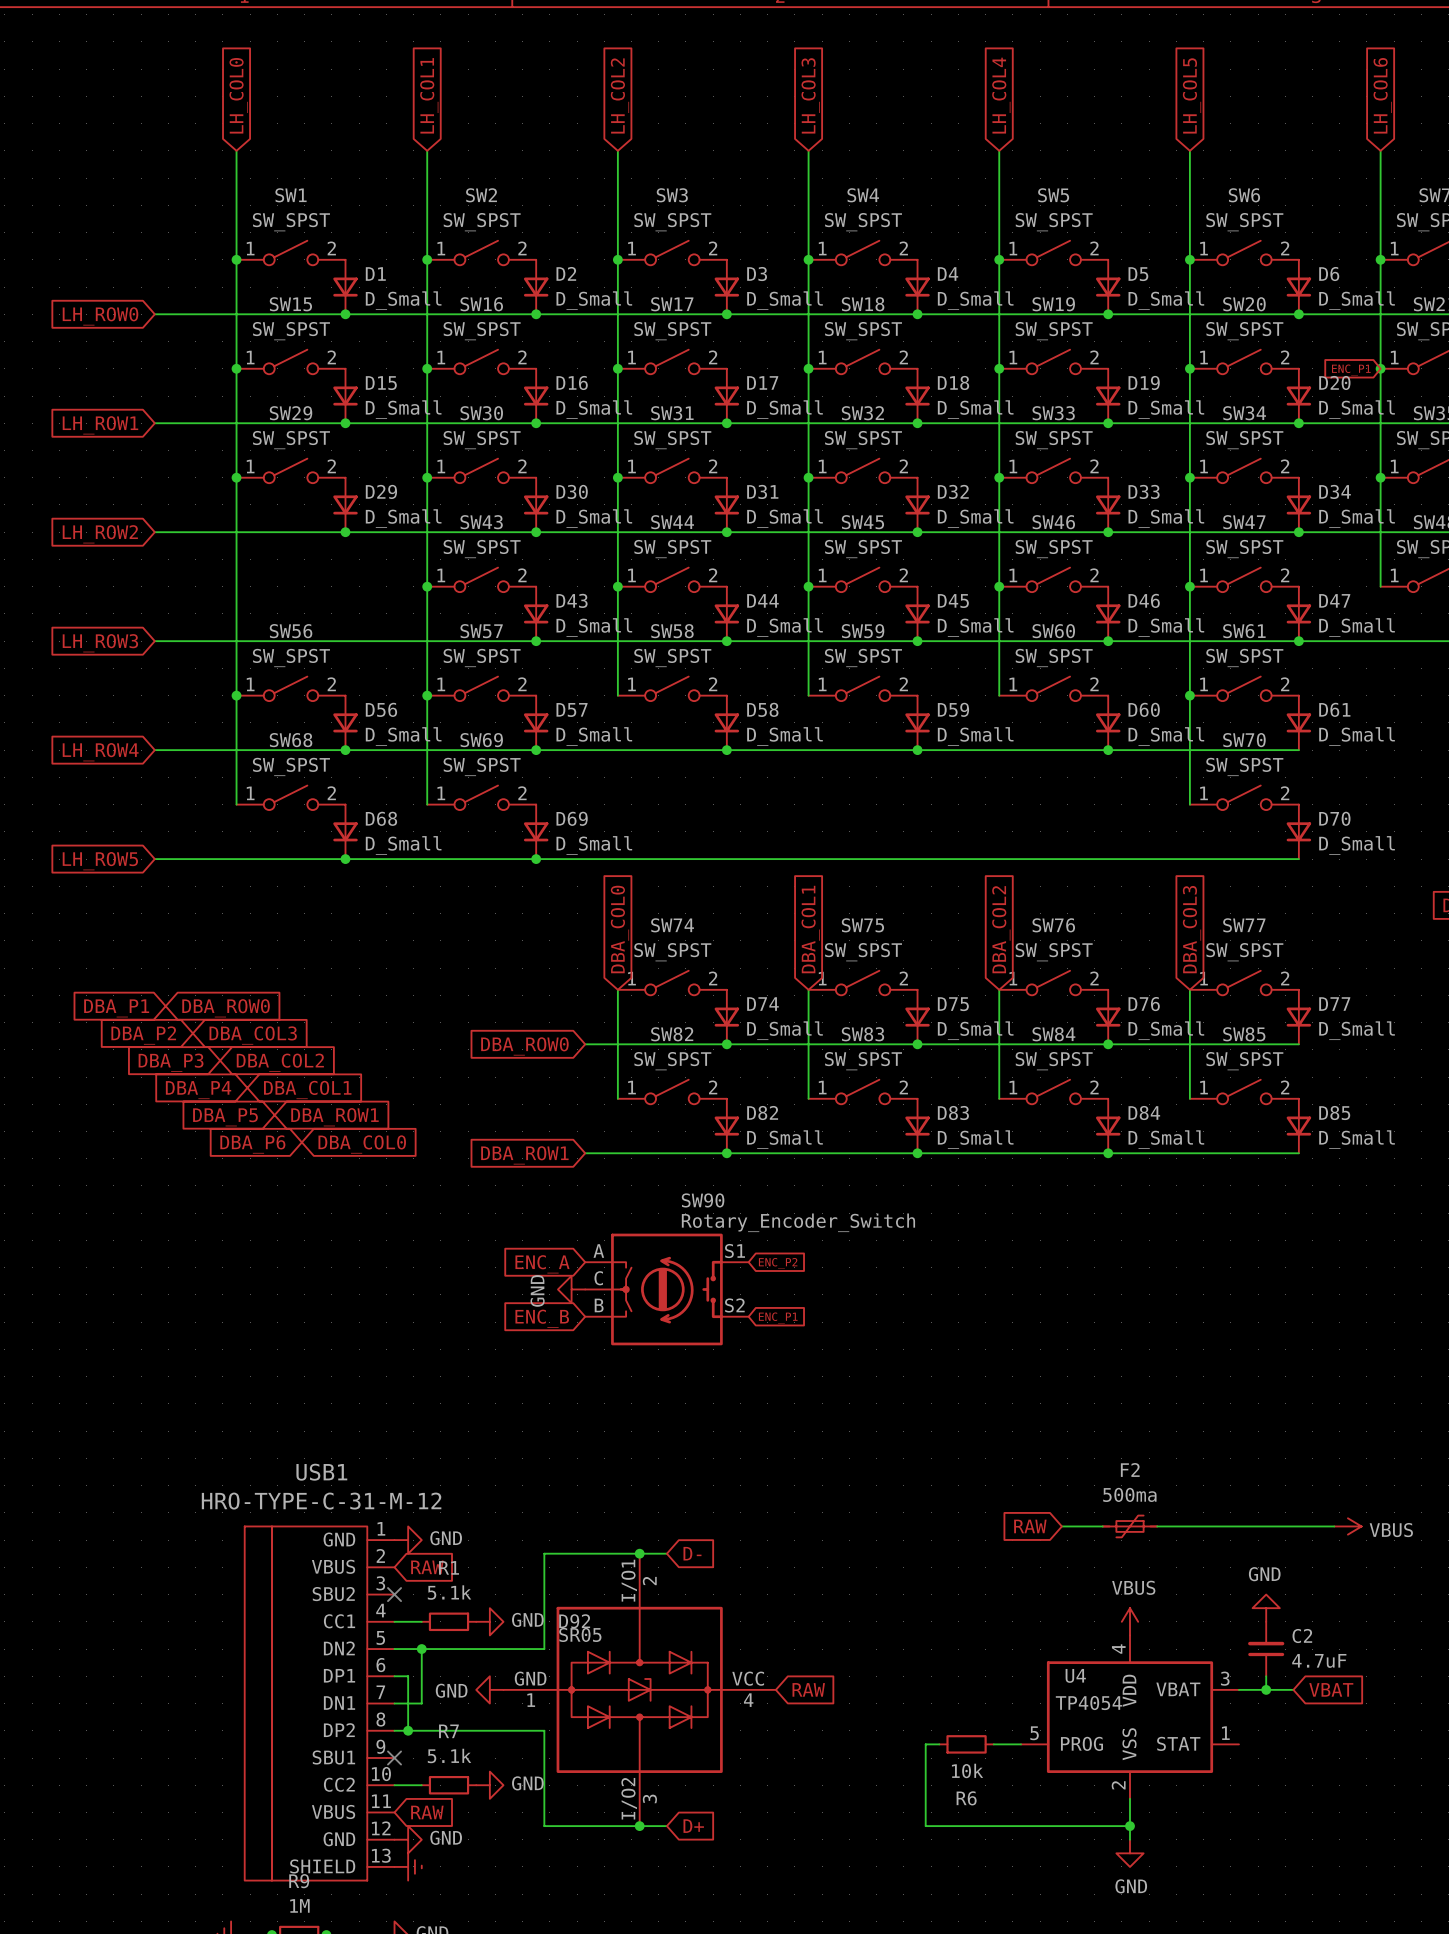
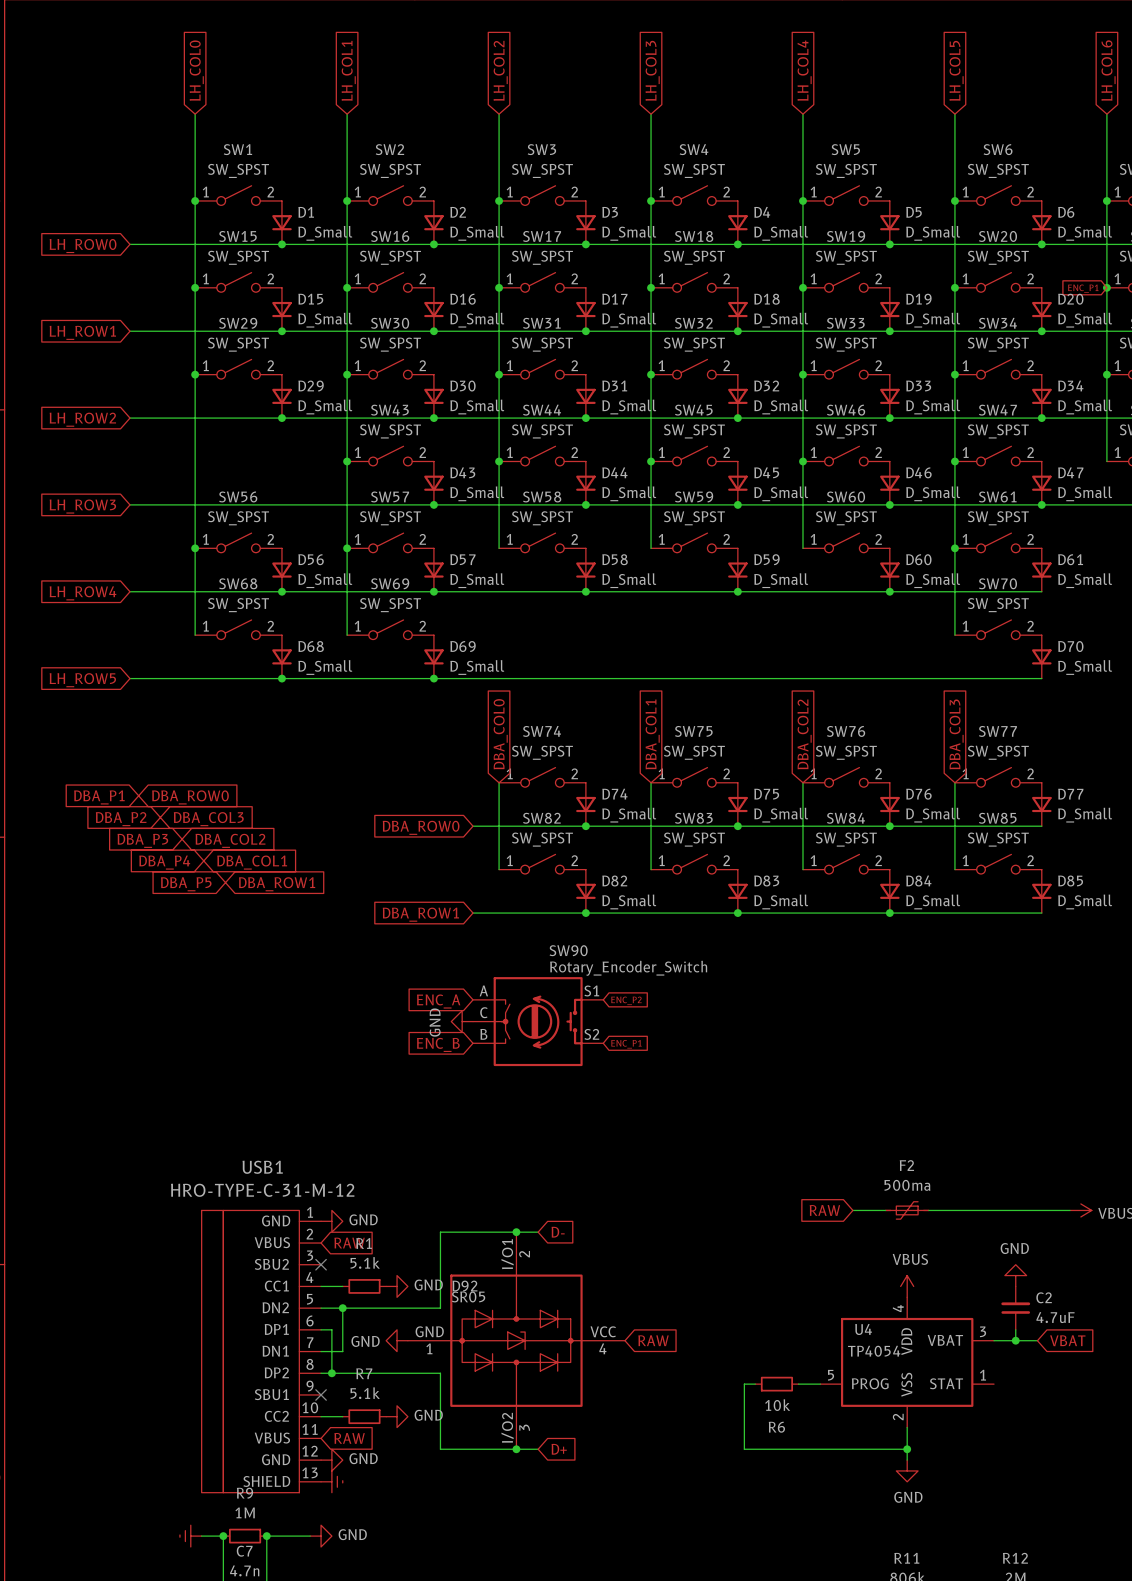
global label: DBA_P6 (252, 1144) -> none
global label: DBA_COL0 (362, 1144) -> none

